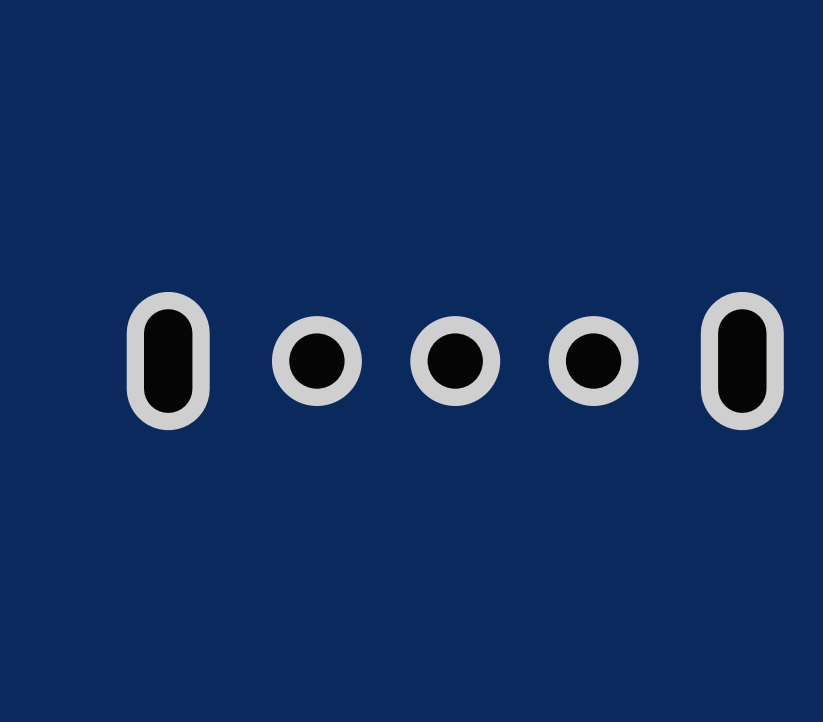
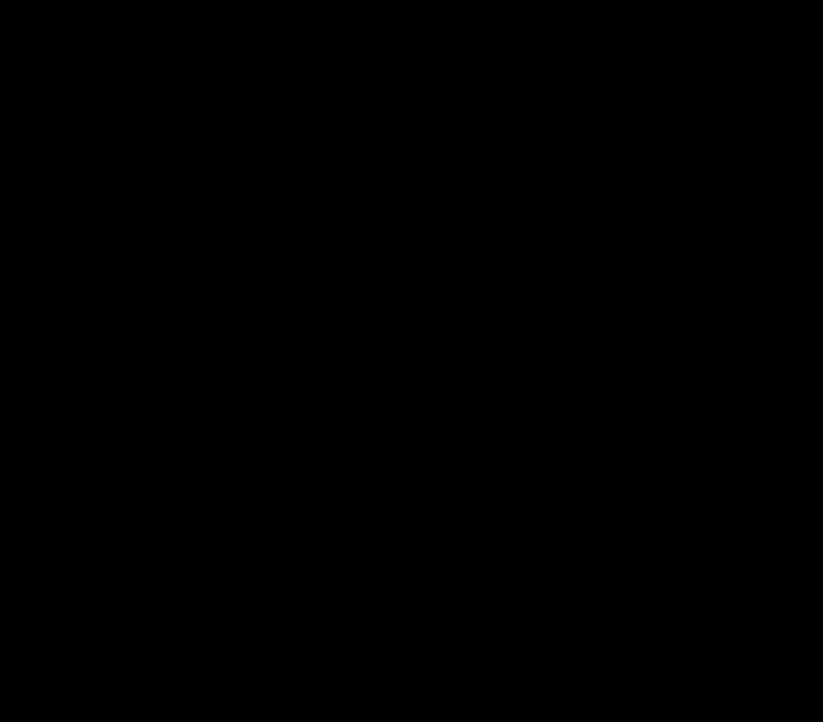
part: (455, 361) -> none

